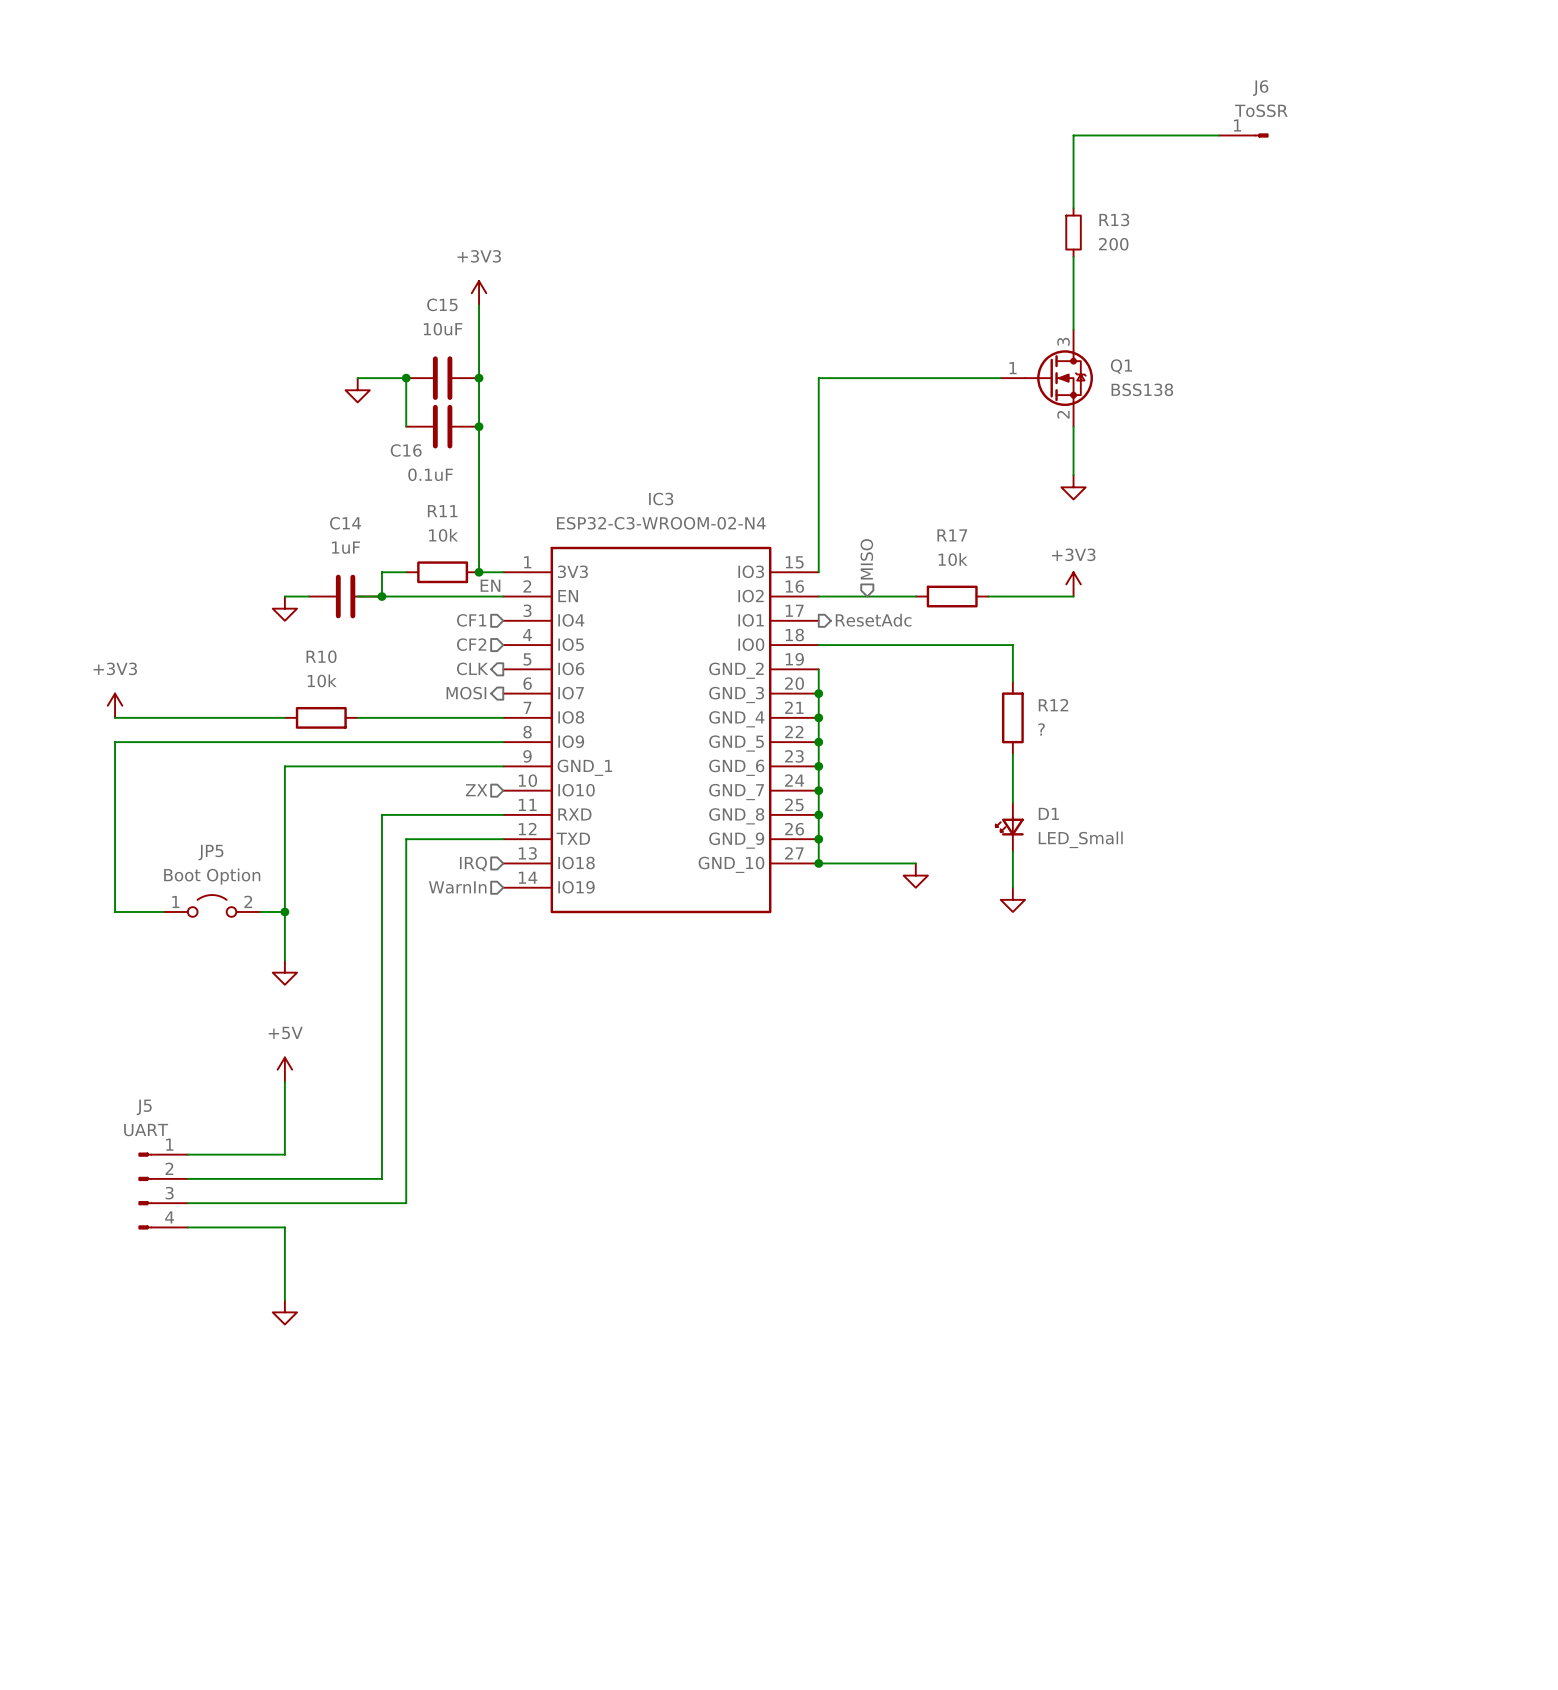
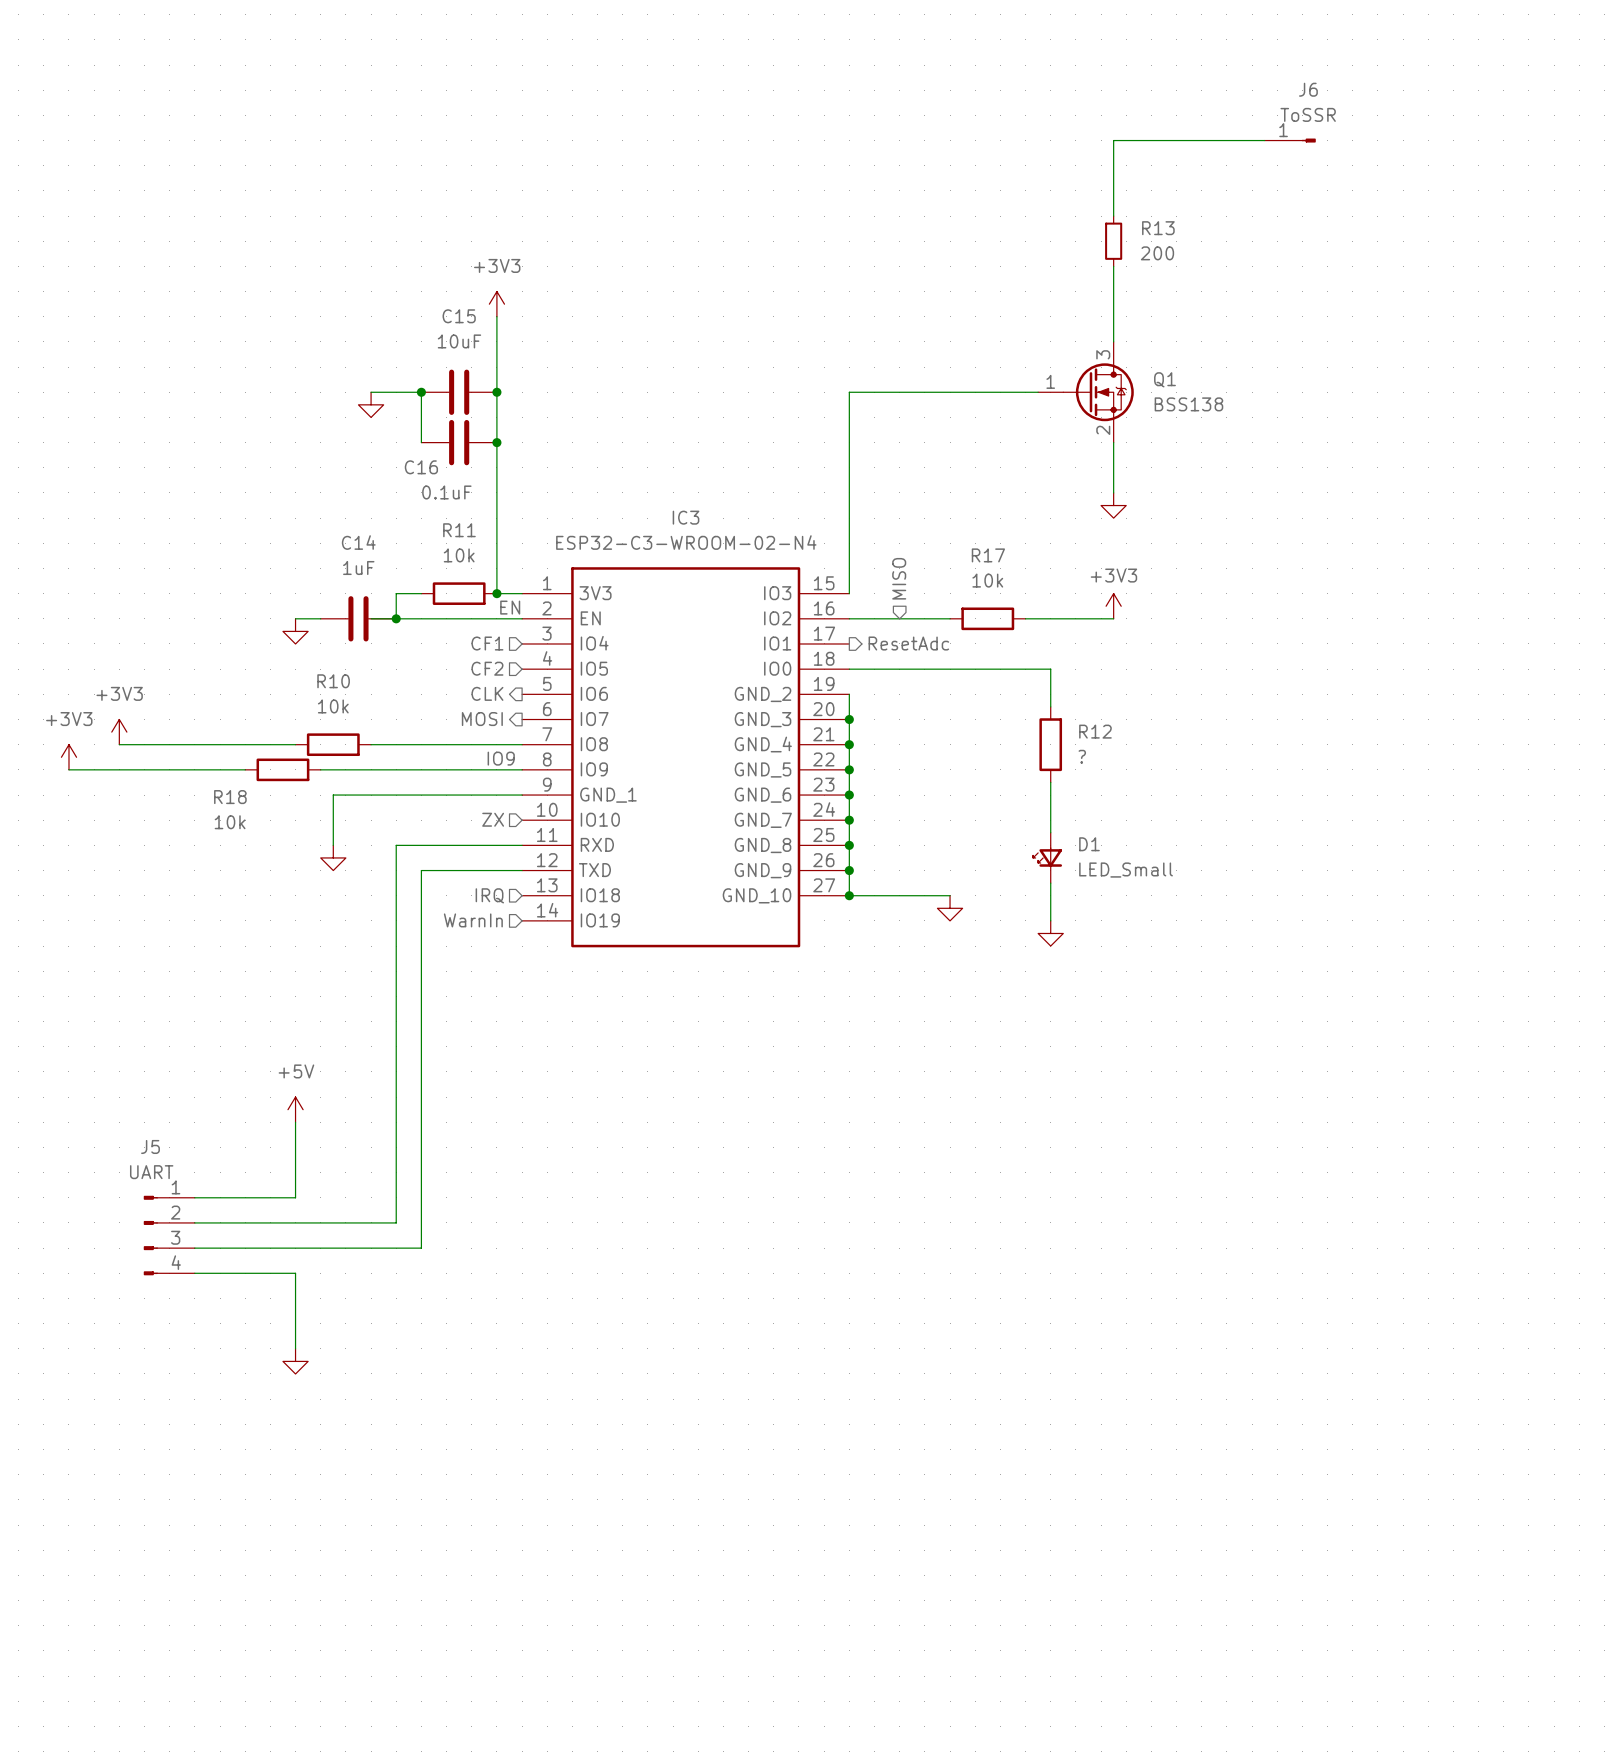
power symbol: none -> +3V3 (68, 757)
label: none -> IO9 (501, 758)
wire: (115, 742) (115, 911) (163, 911) -> (119, 769) (68, 769)
wire: (236, 742) (309, 742) -> none
R18: none -> 10k (282, 769)
wire: (321, 766) (284, 766) (284, 960) -> (333, 795) (333, 845)
JP5: Boot Option (212, 905) -> none
wire: (260, 911) (284, 911) -> none
junction: (284, 911) -> none
power symbol position: (284, 972) -> (333, 857)

